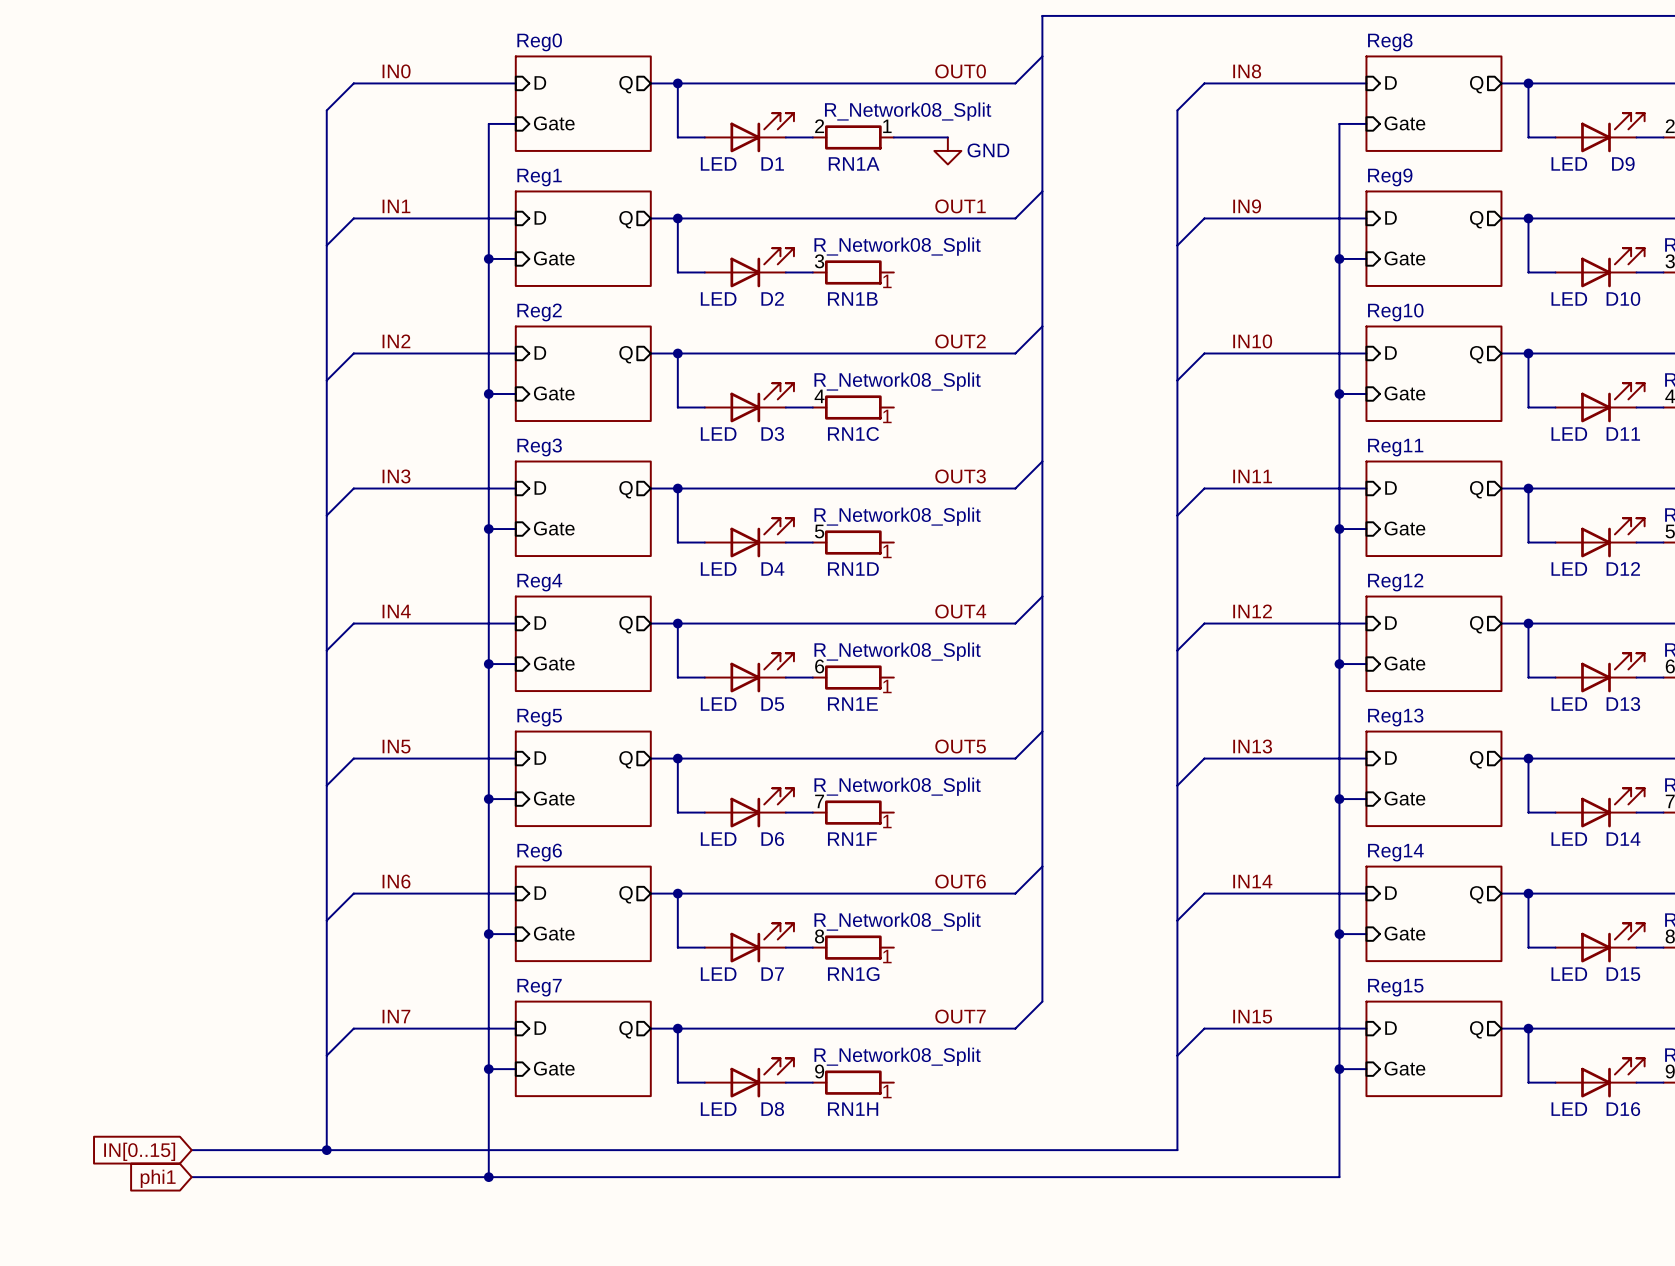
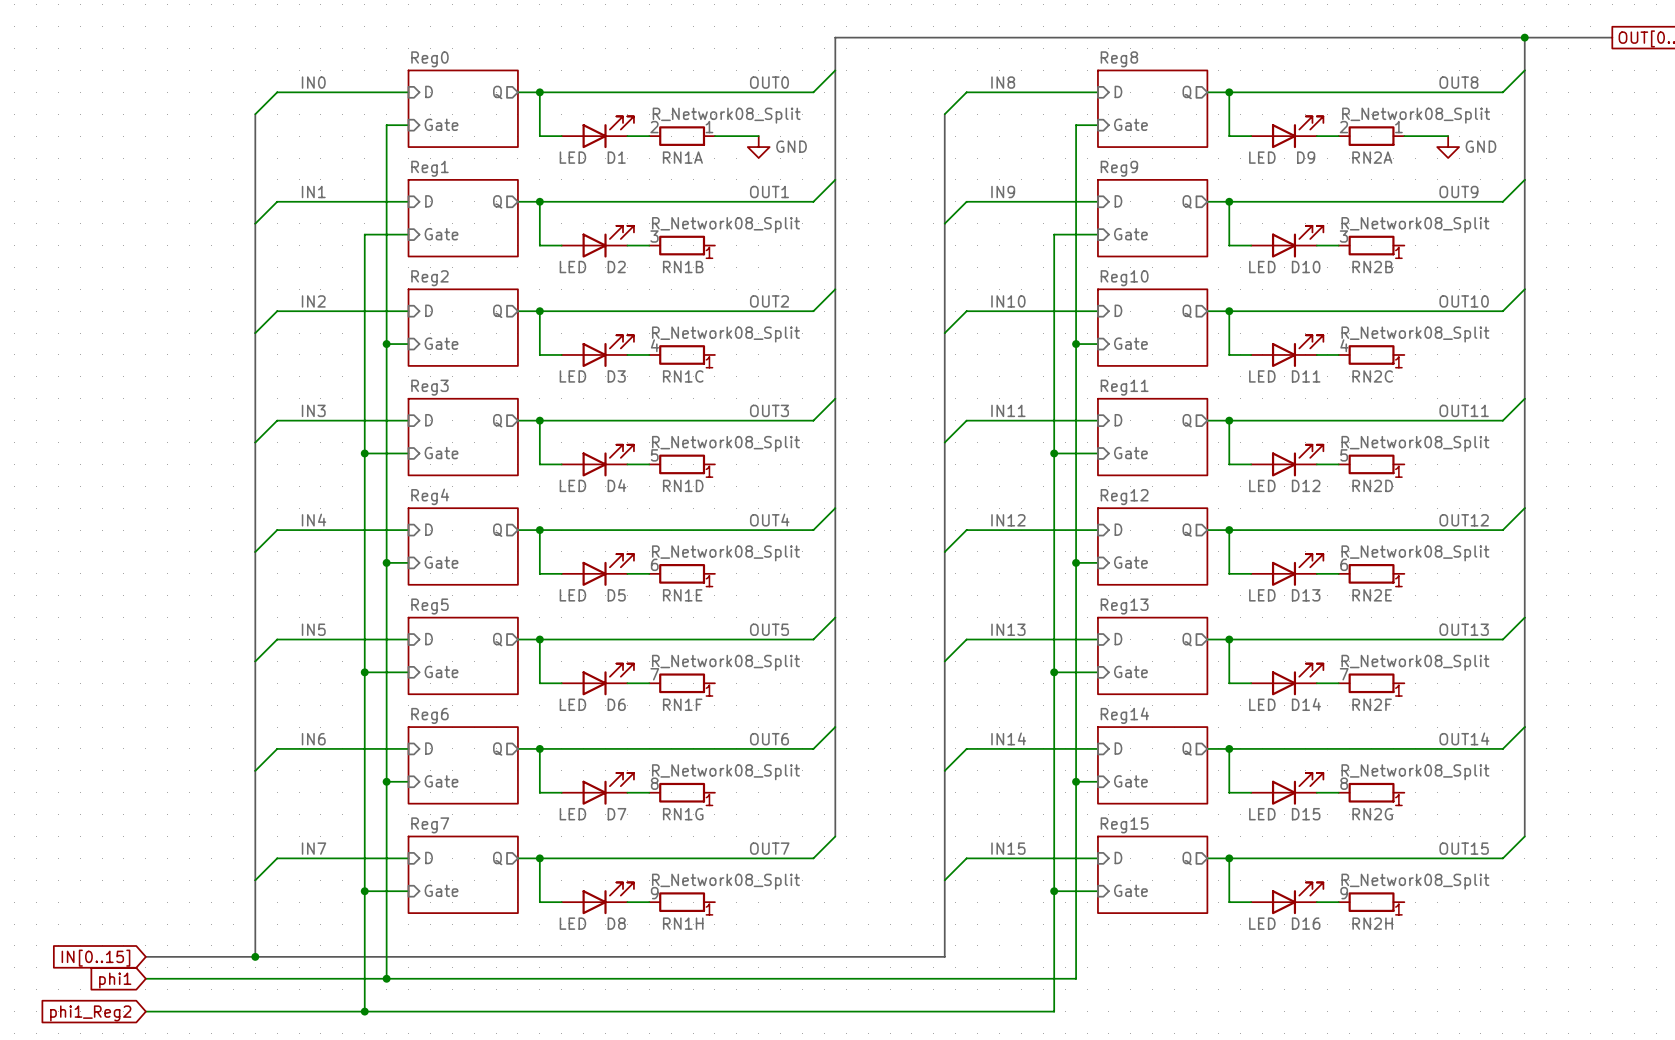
wire: none -> (386, 234) (364, 234) (364, 1011)
junction: (488, 258) -> none
wire: none -> (1076, 234) (1054, 234) (1054, 1011) (145, 1011)
junction: (1339, 258) -> none
wire: none -> (364, 453) (386, 453)
junction position: (488, 529) -> (364, 453)
wire: none -> (1054, 453) (1076, 453)
junction position: (1339, 529) -> (1054, 453)
wire: none -> (364, 672) (386, 672)
junction position: (488, 799) -> (364, 672)
wire: none -> (1054, 672) (1076, 672)
junction position: (1339, 799) -> (1054, 672)
wire: none -> (364, 891) (386, 891)
junction position: (488, 1069) -> (364, 891)
wire: none -> (1054, 891) (1076, 891)
junction position: (1339, 1069) -> (1054, 891)
junction: none -> (364, 1011)
global label: none -> phi1_Reg2 (90, 1013)

